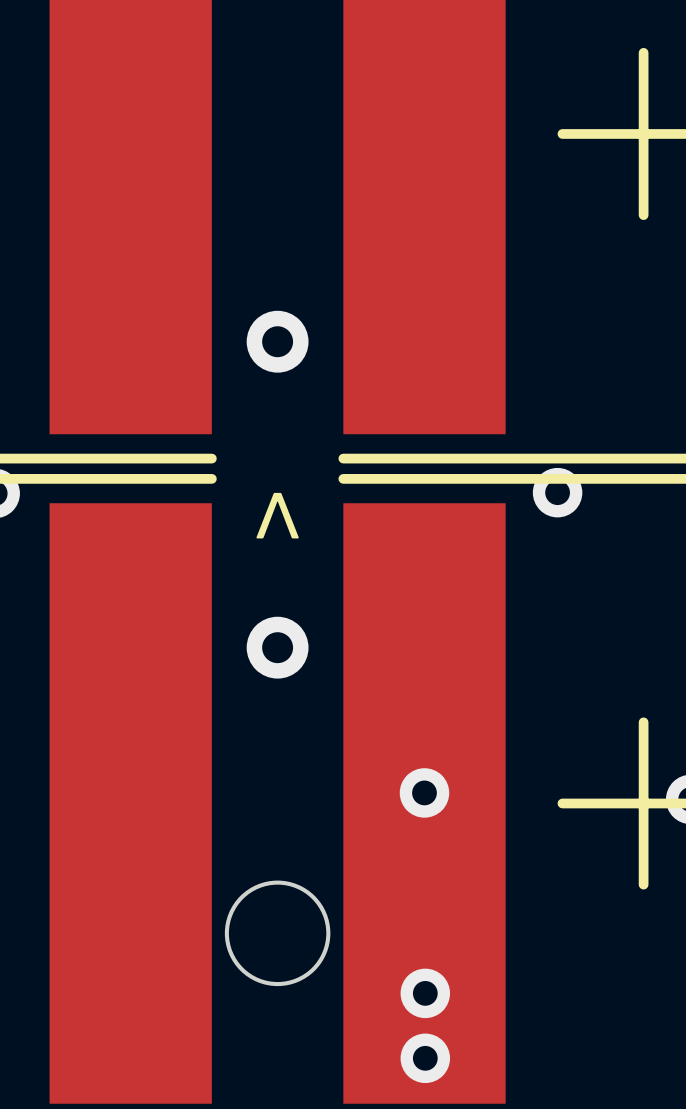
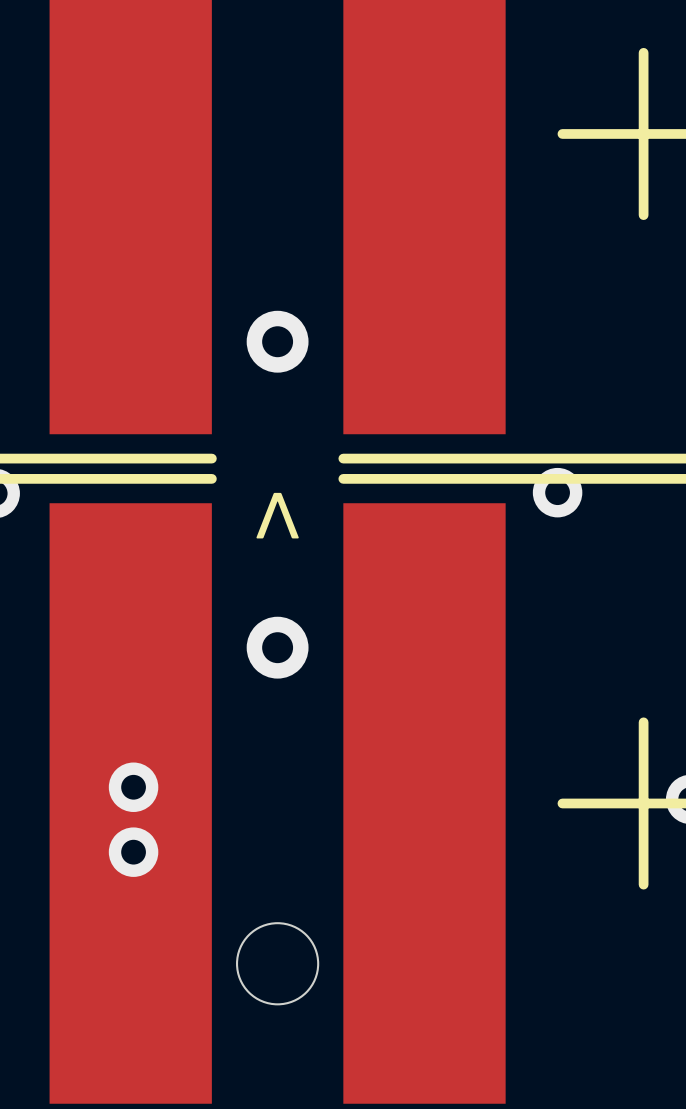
via: none -> (133, 787)
via: (424, 792) -> none
via: none -> (133, 852)
round board edge size: [224, 880, 331, 987] -> [236, 922, 320, 1006]
via: (425, 993) -> none
via: (425, 1058) -> none

